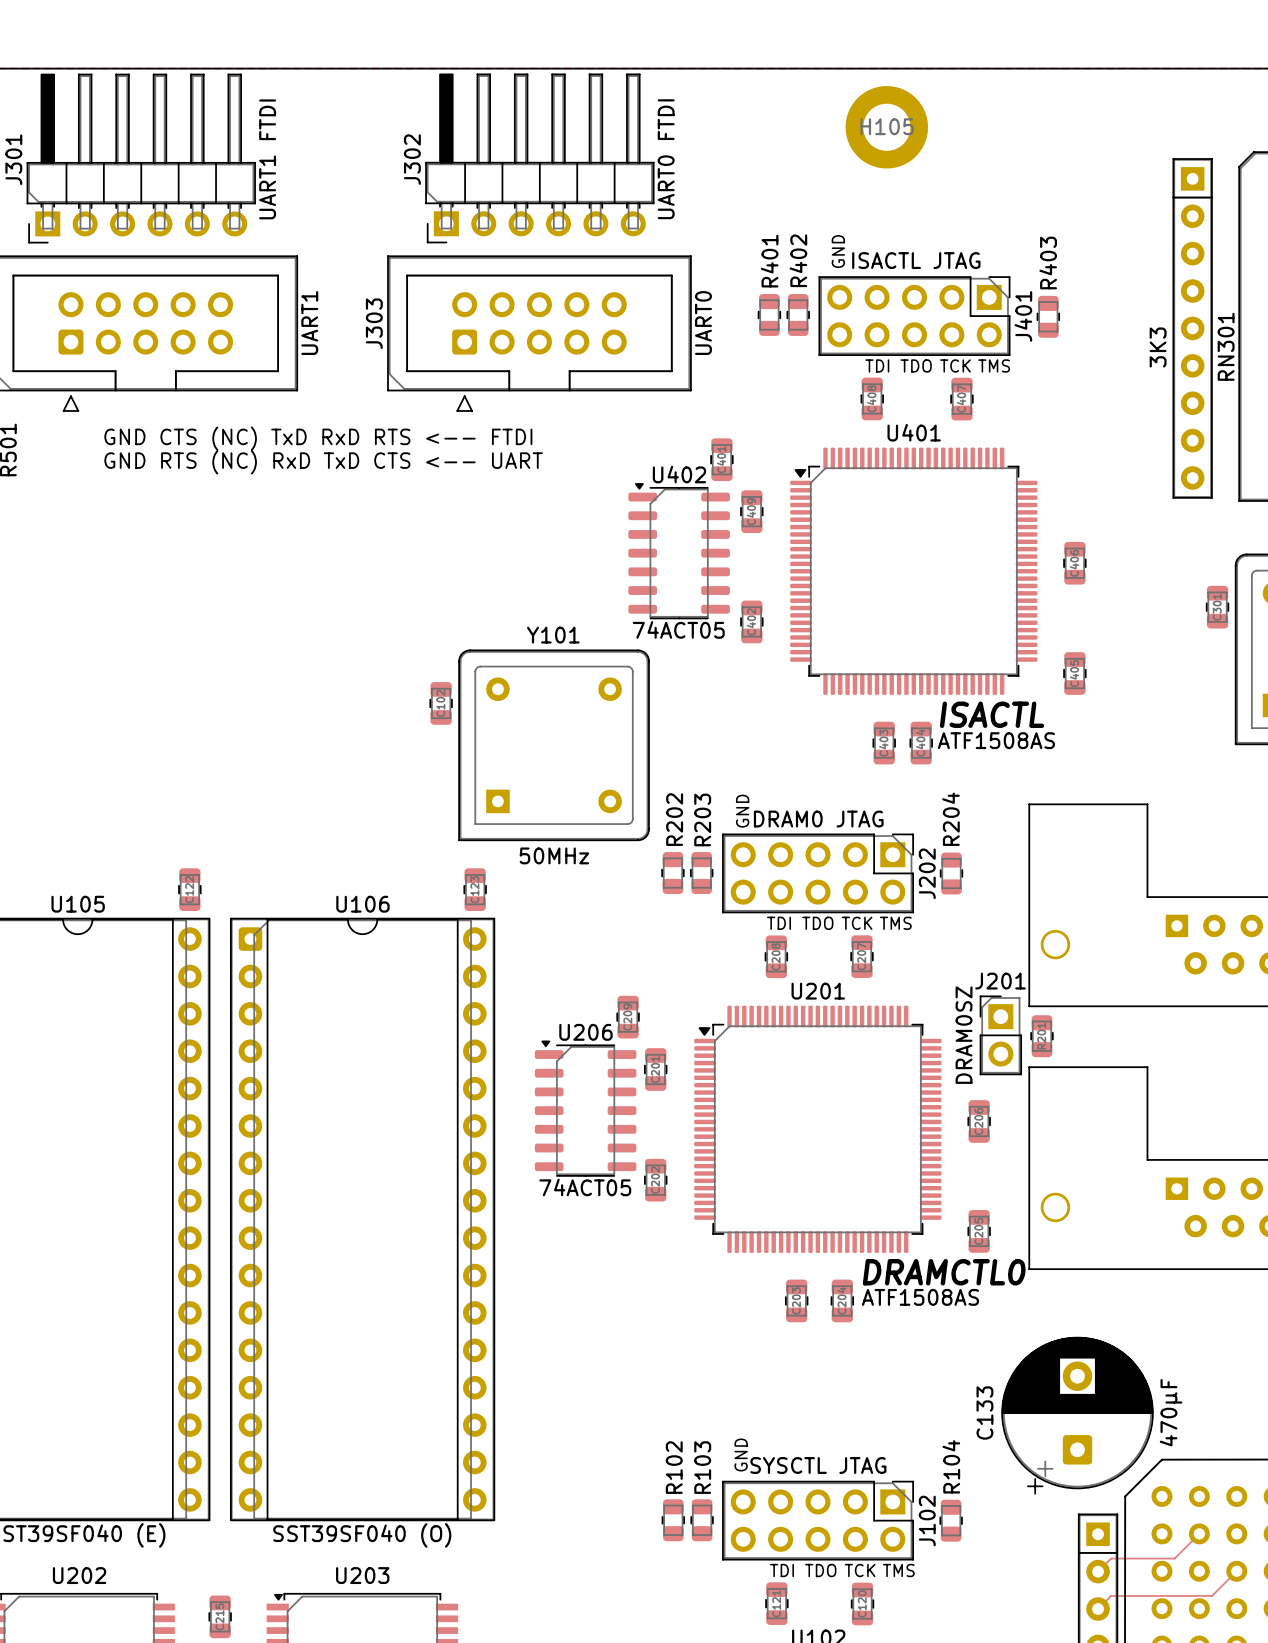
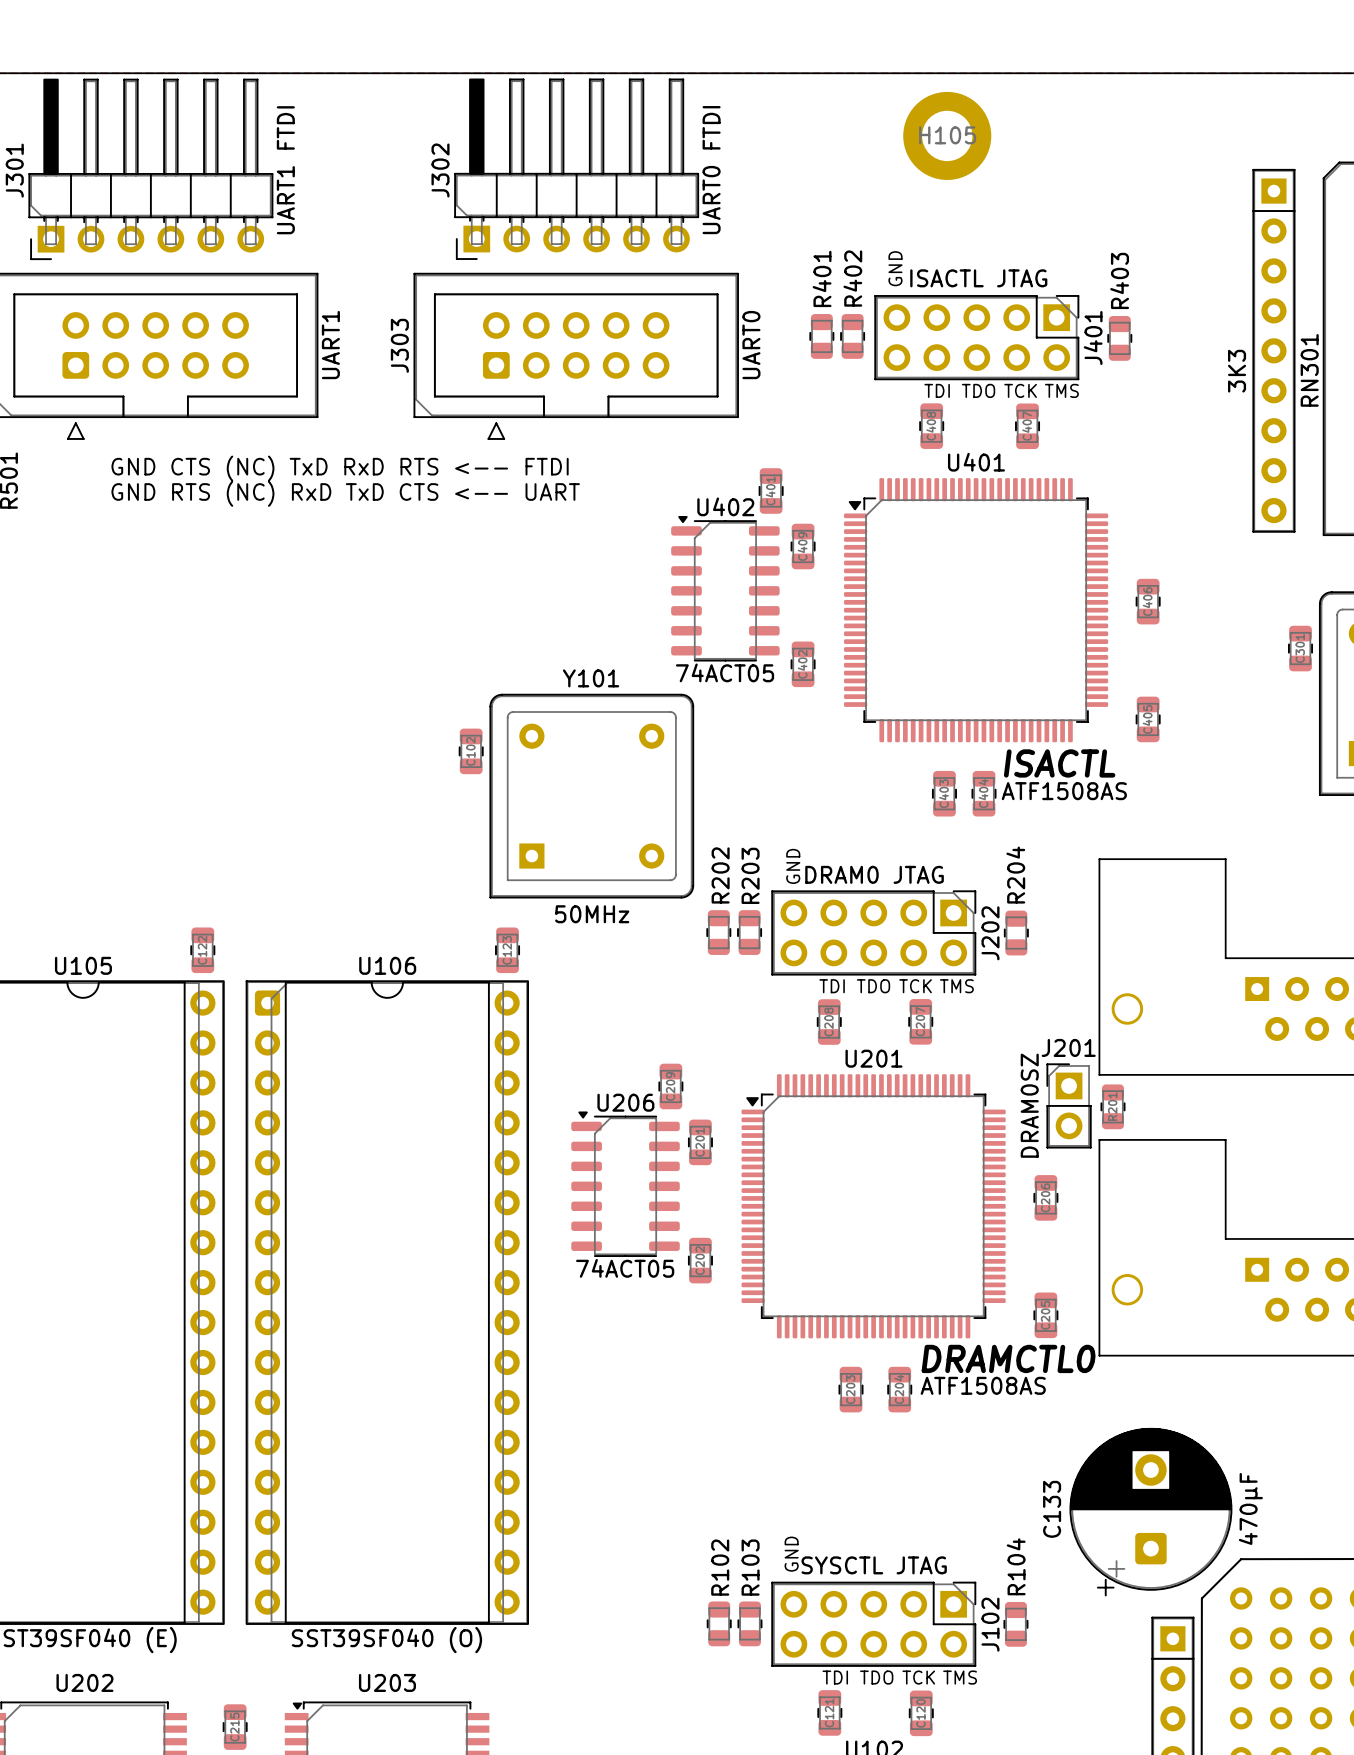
track: (1199, 1533) (1174, 1558) (1111, 1558) (1098, 1571) -> none
track: (1236, 1571) (1212, 1595) (1111, 1595) (1098, 1609) -> none

